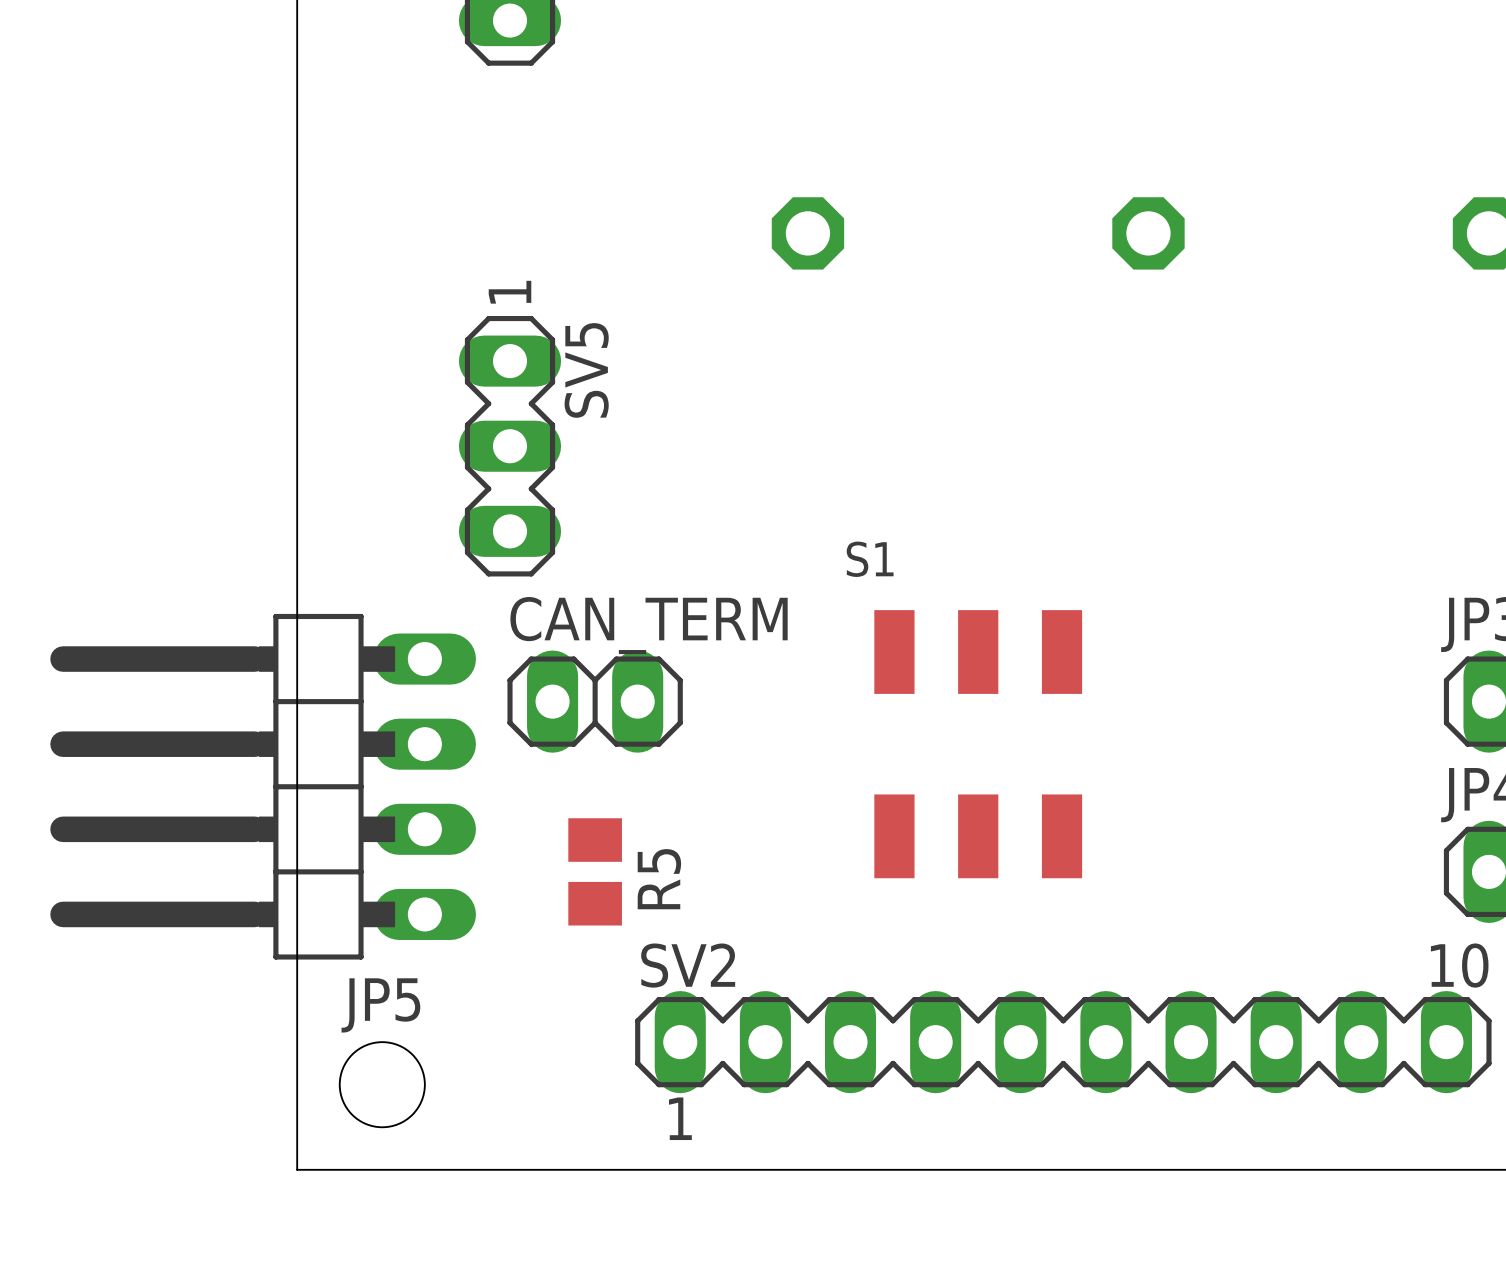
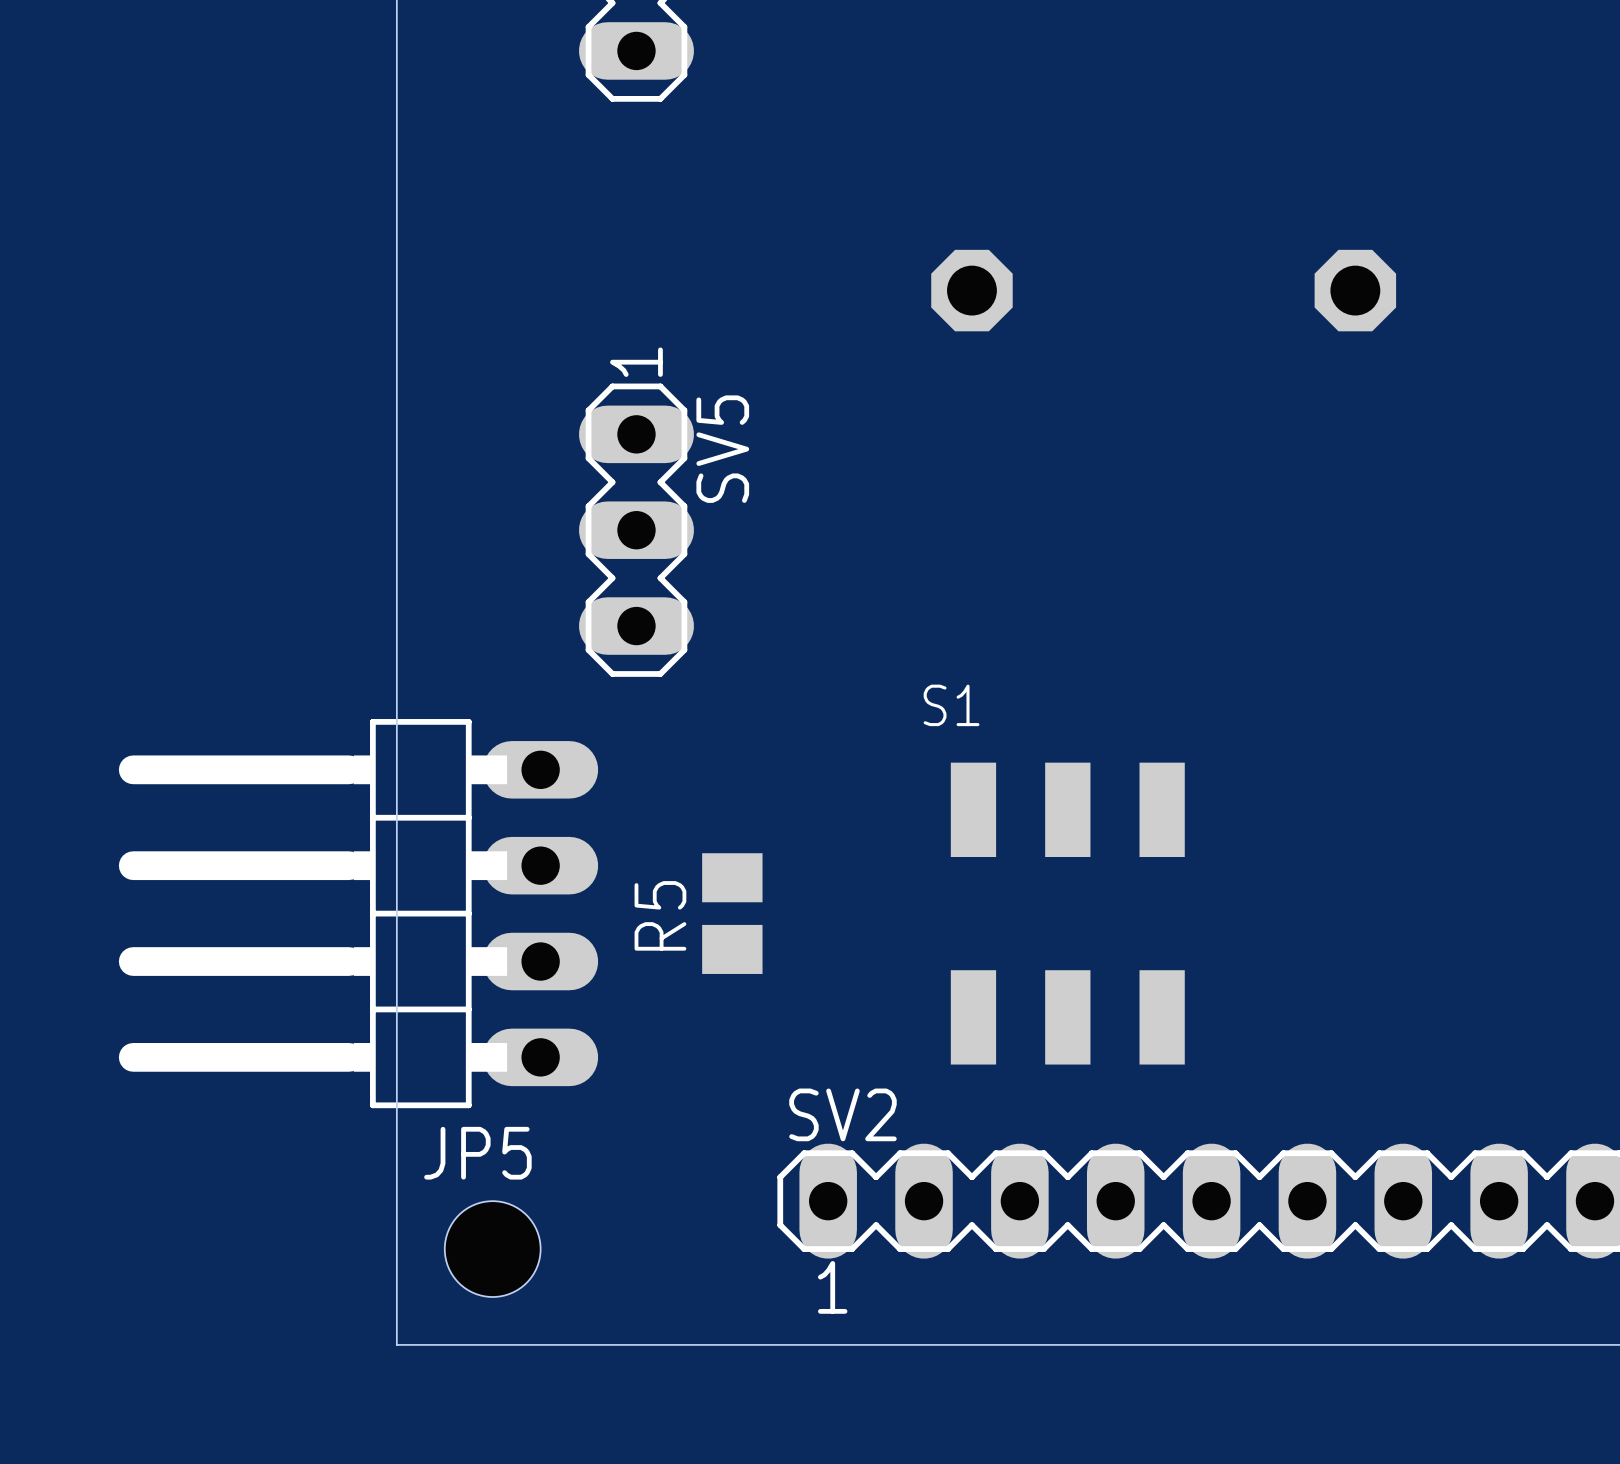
CAN_TERM: (595, 701) -> none
S1 position: (978, 744) -> (1067, 913)
R5 position: (595, 871) -> (732, 913)
R5 name position: R5 (659, 879) -> R5 (660, 915)

